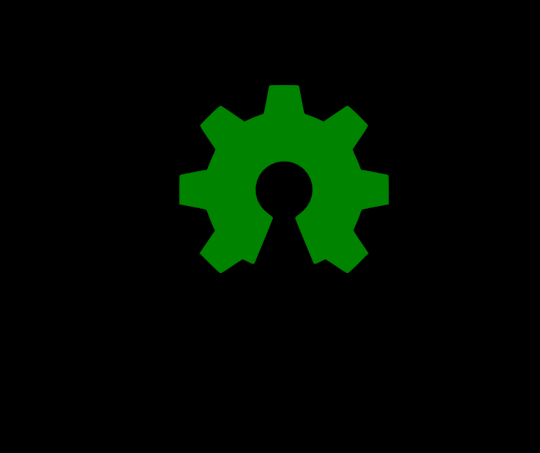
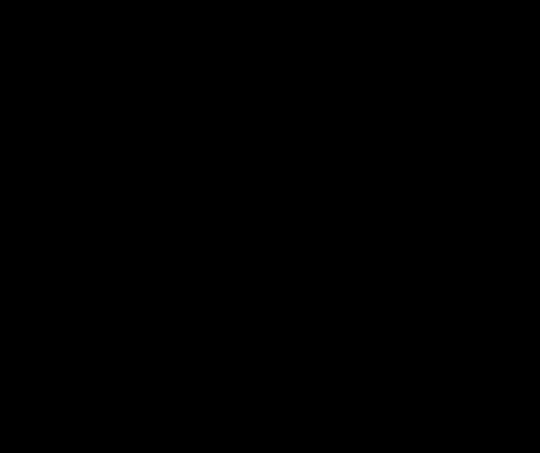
drawing: [179, 84, 389, 274] -> none

